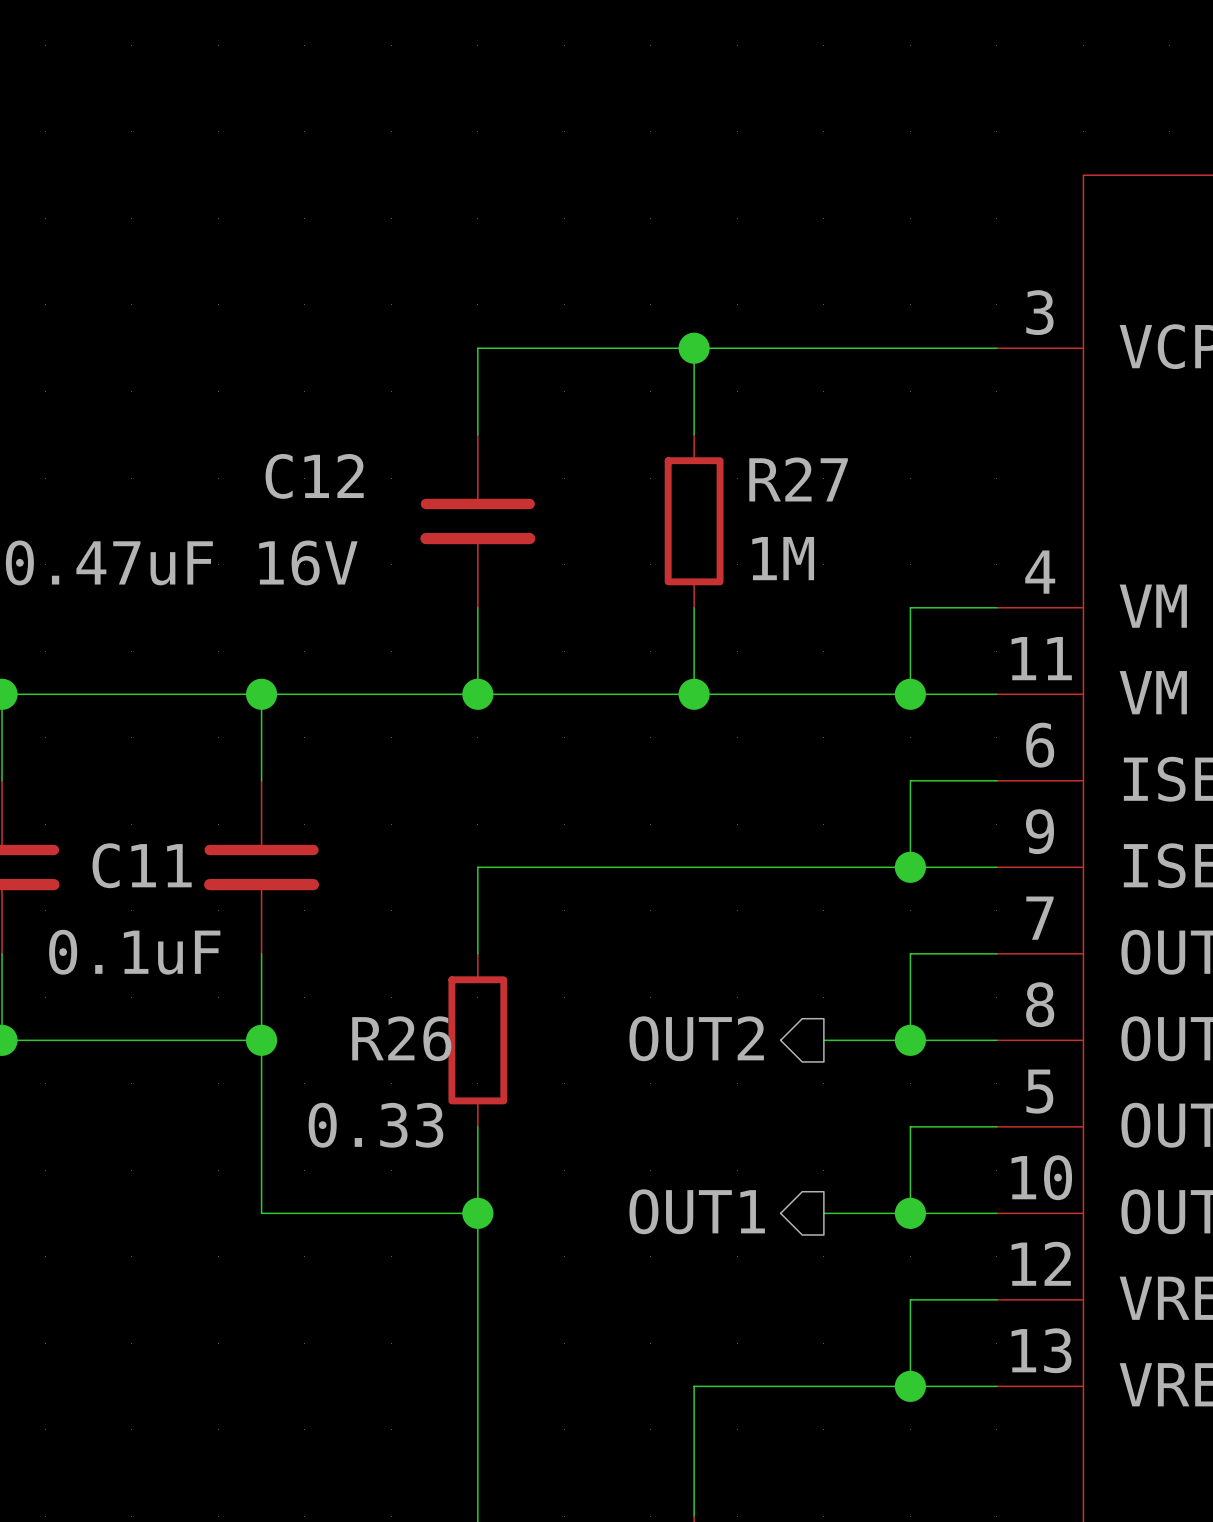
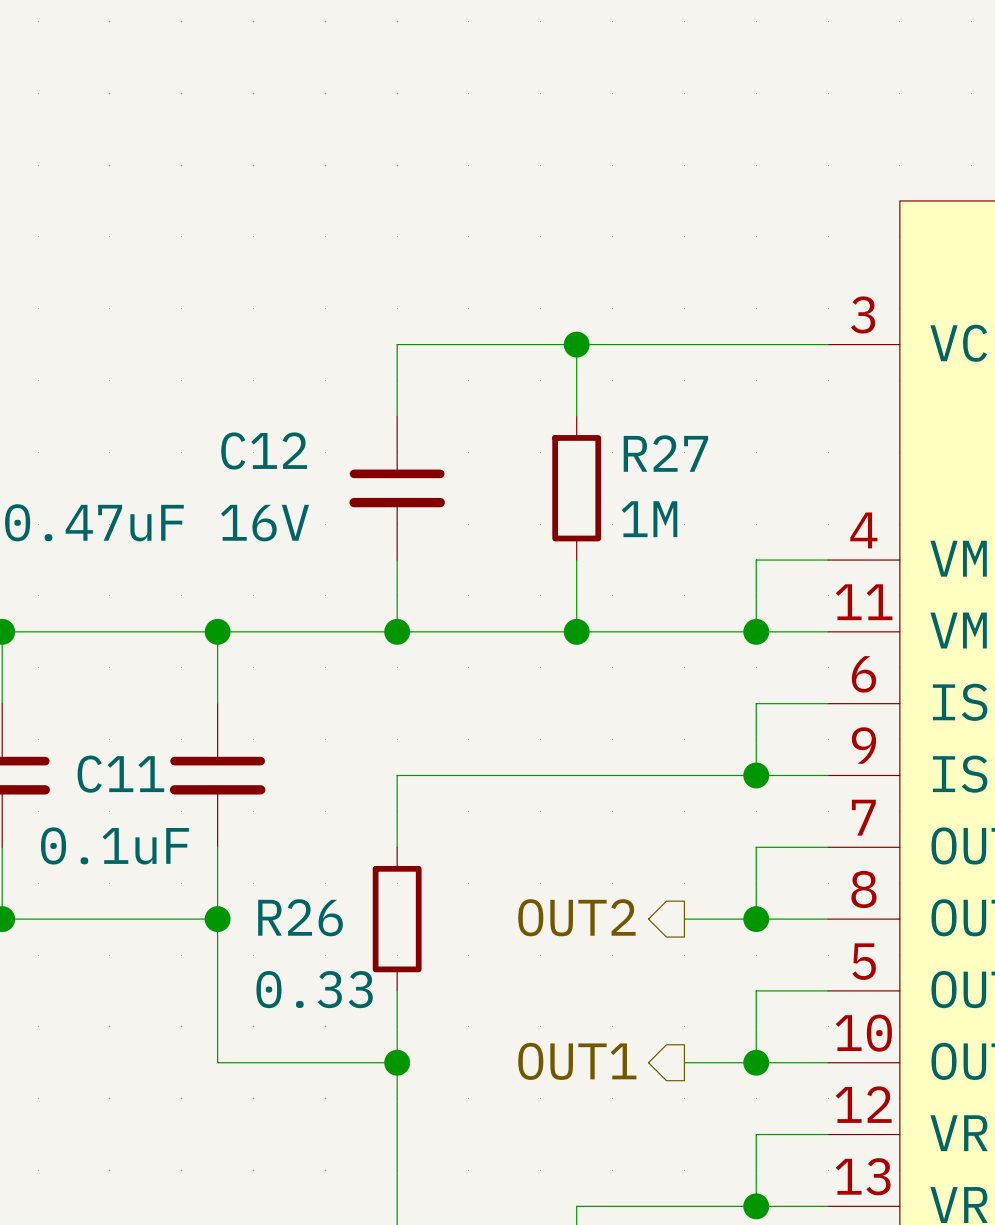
R26 name position: R26 (401, 1038) -> R26 (300, 917)

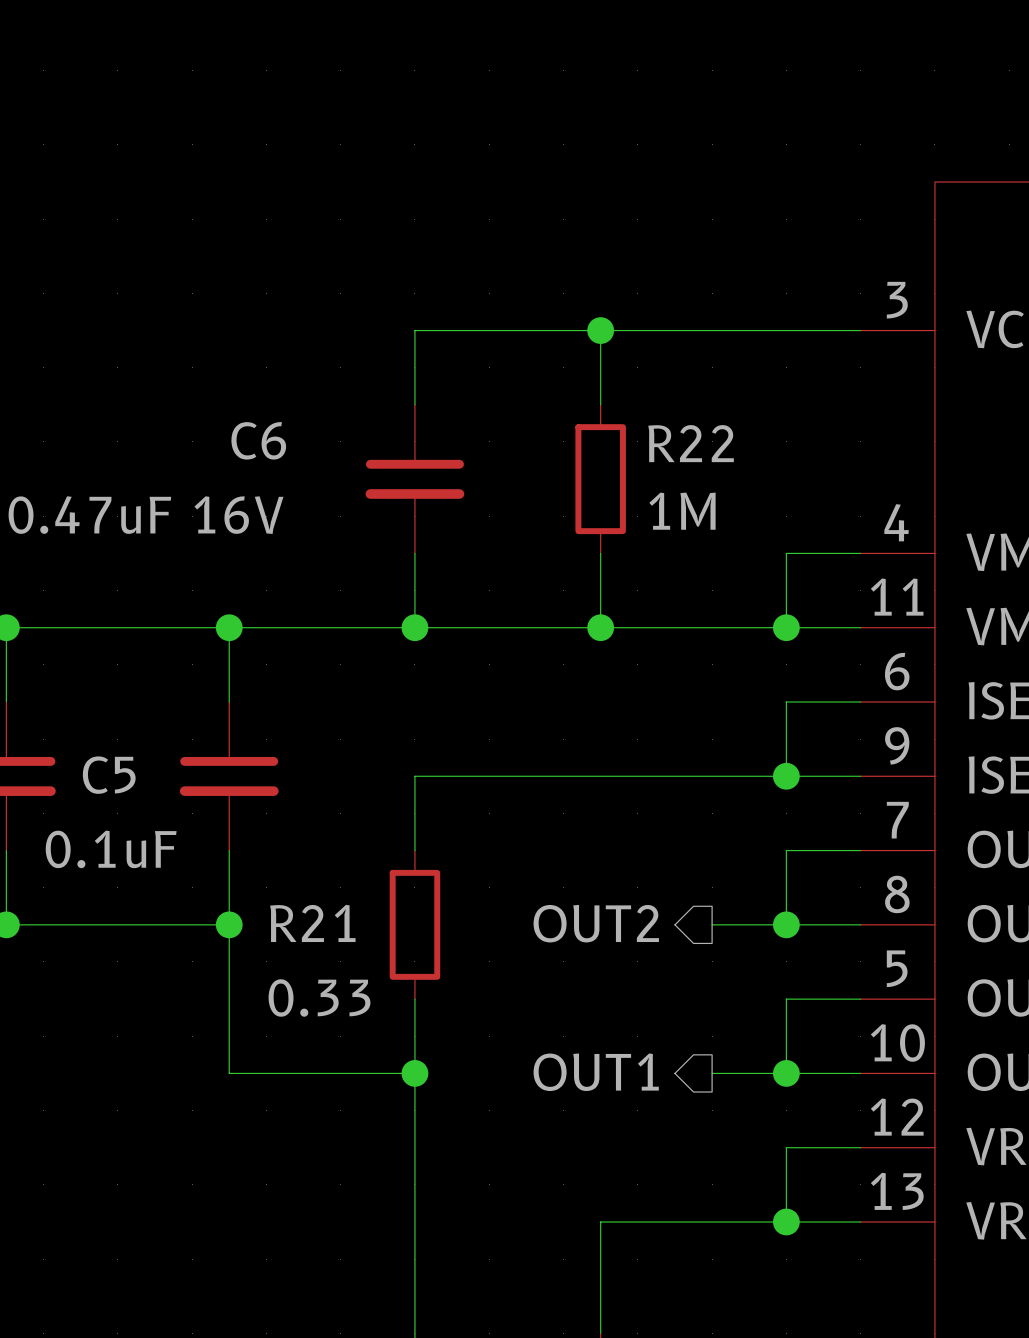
C12 name: C12 (264, 450) -> C6 (258, 440)
R27 name: R27 (665, 453) -> R22 (691, 443)
C11 name: C11 (120, 774) -> C5 (109, 775)
R26 name: R26 (300, 917) -> R21 (312, 923)

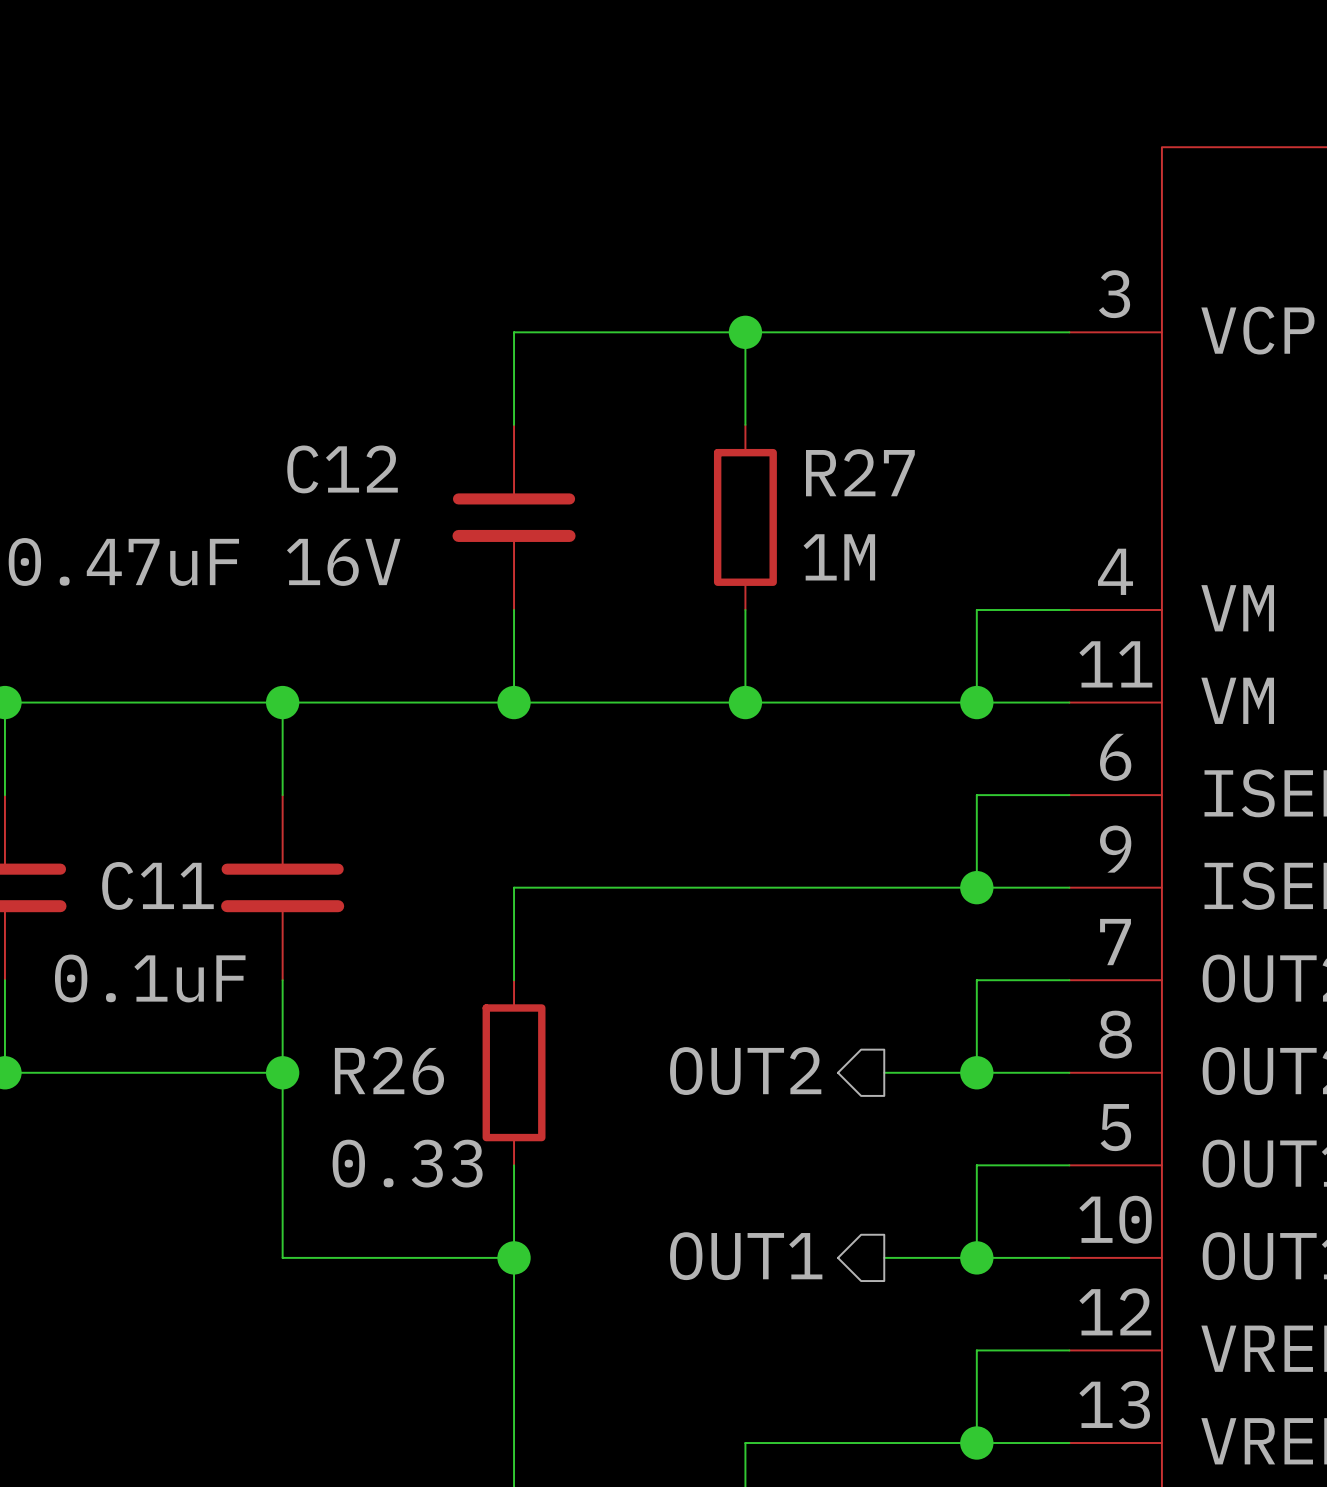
C6 name: C6 (258, 440) -> C12 (342, 469)
R22 name: R22 (691, 443) -> R27 (860, 472)
C5 name: C5 (109, 775) -> C11 (157, 885)
R21 name: R21 (312, 923) -> R26 (389, 1071)

